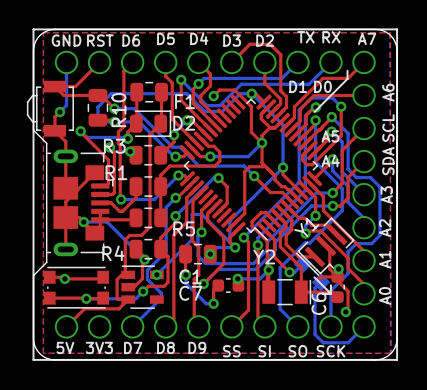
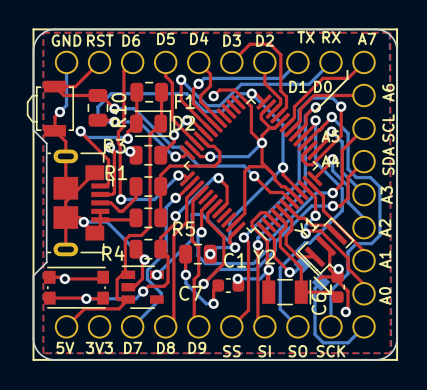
C1 name position: C1 (190, 276) -> C1 (235, 260)

